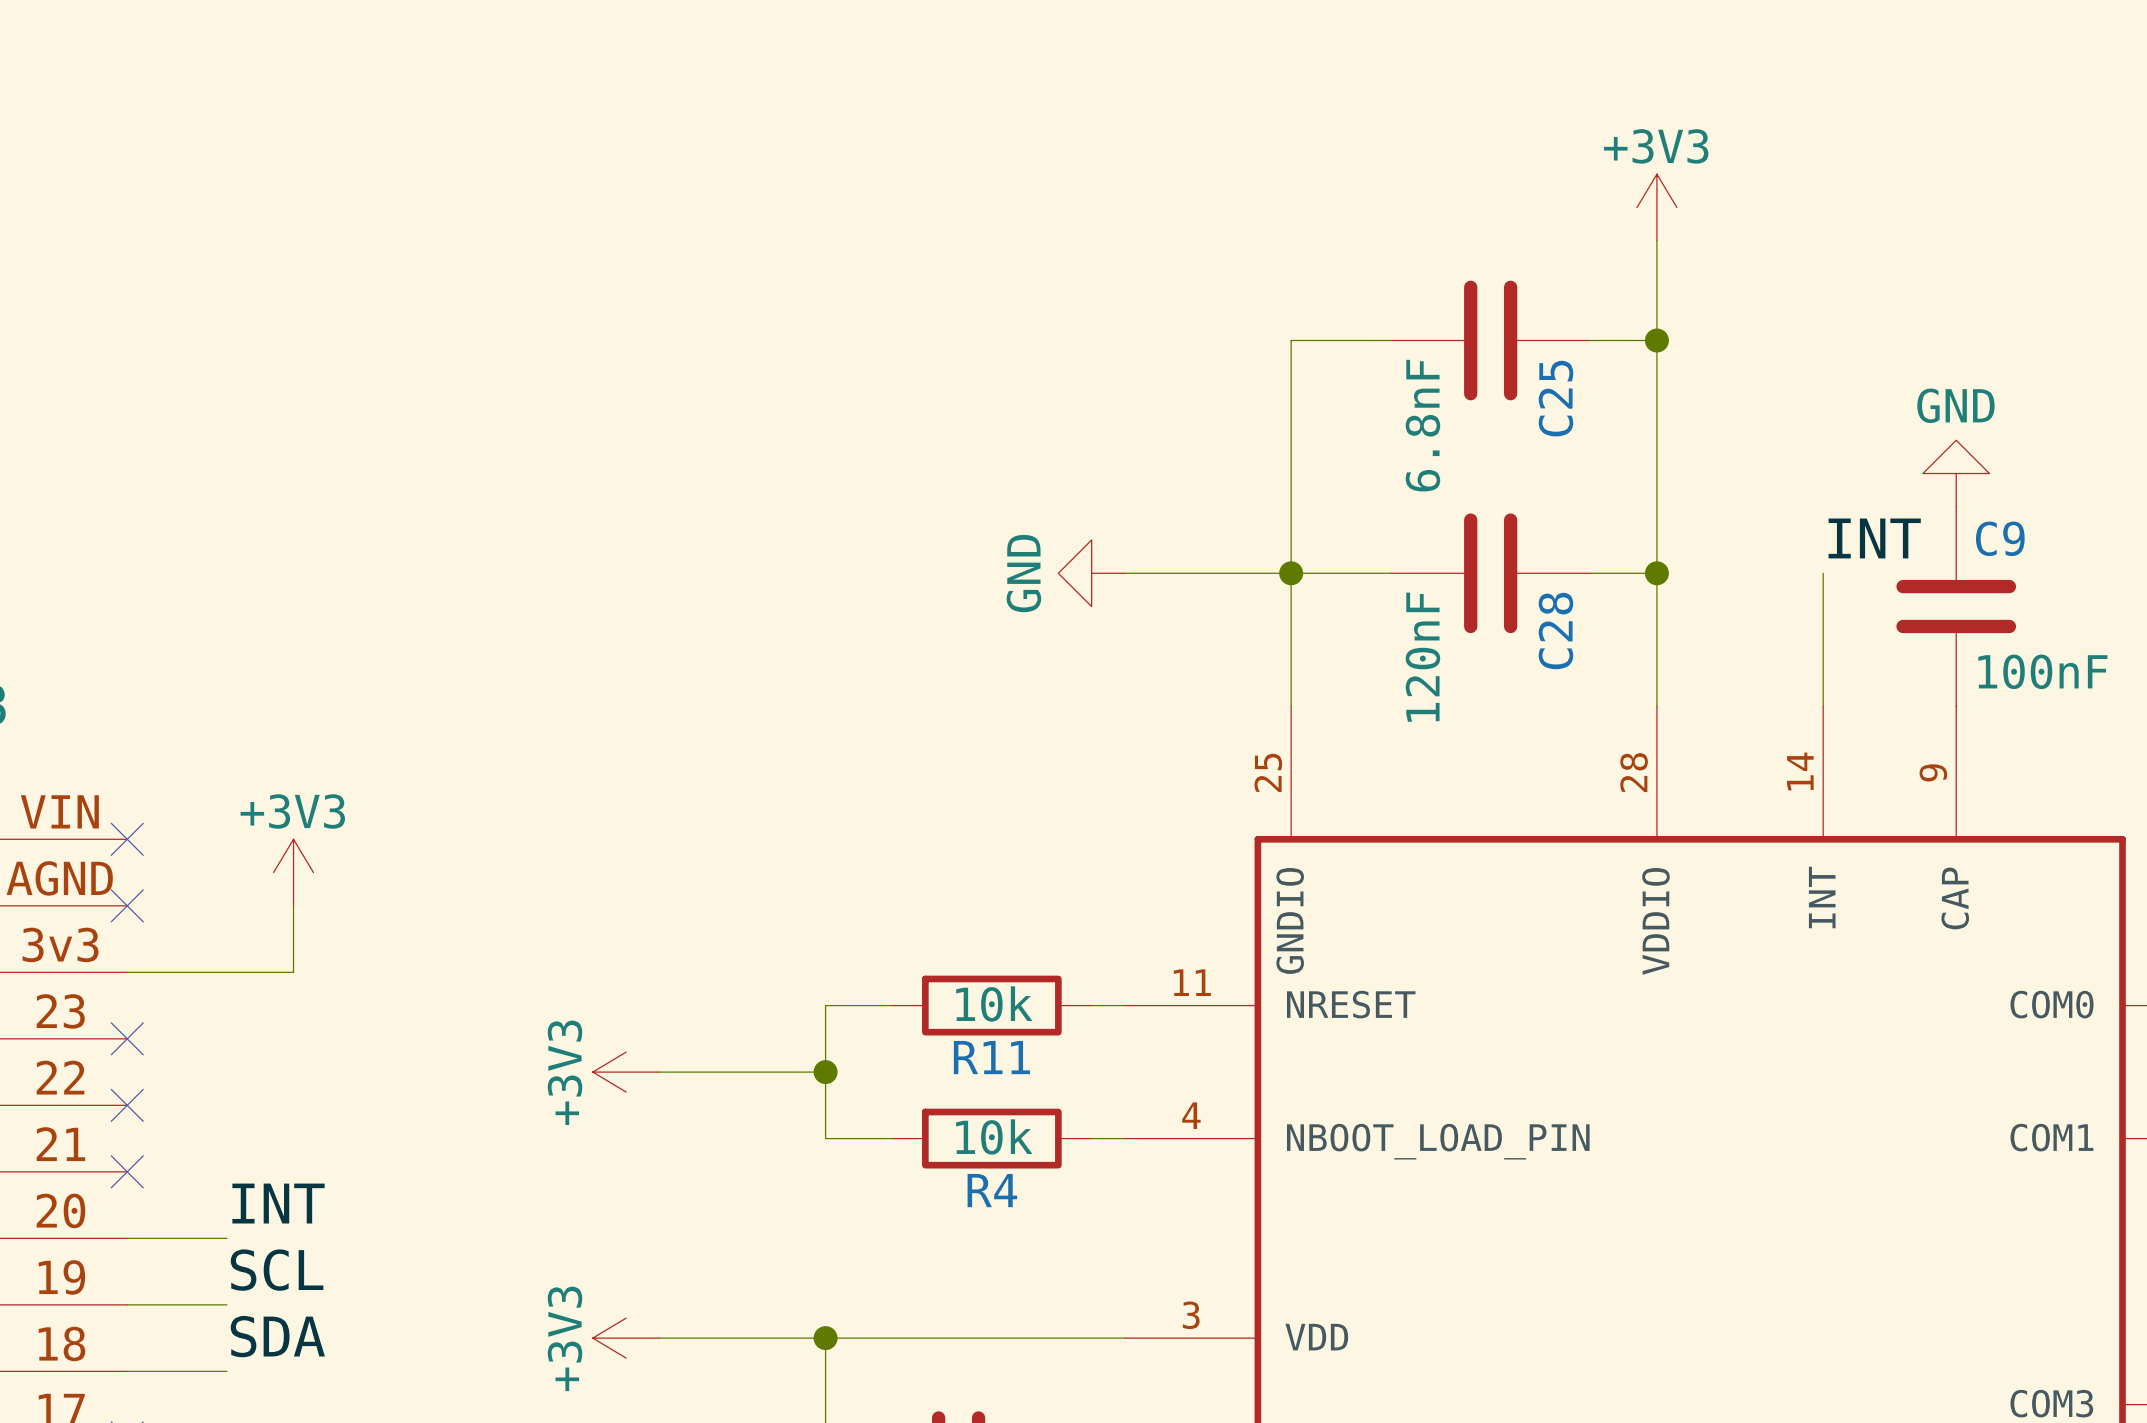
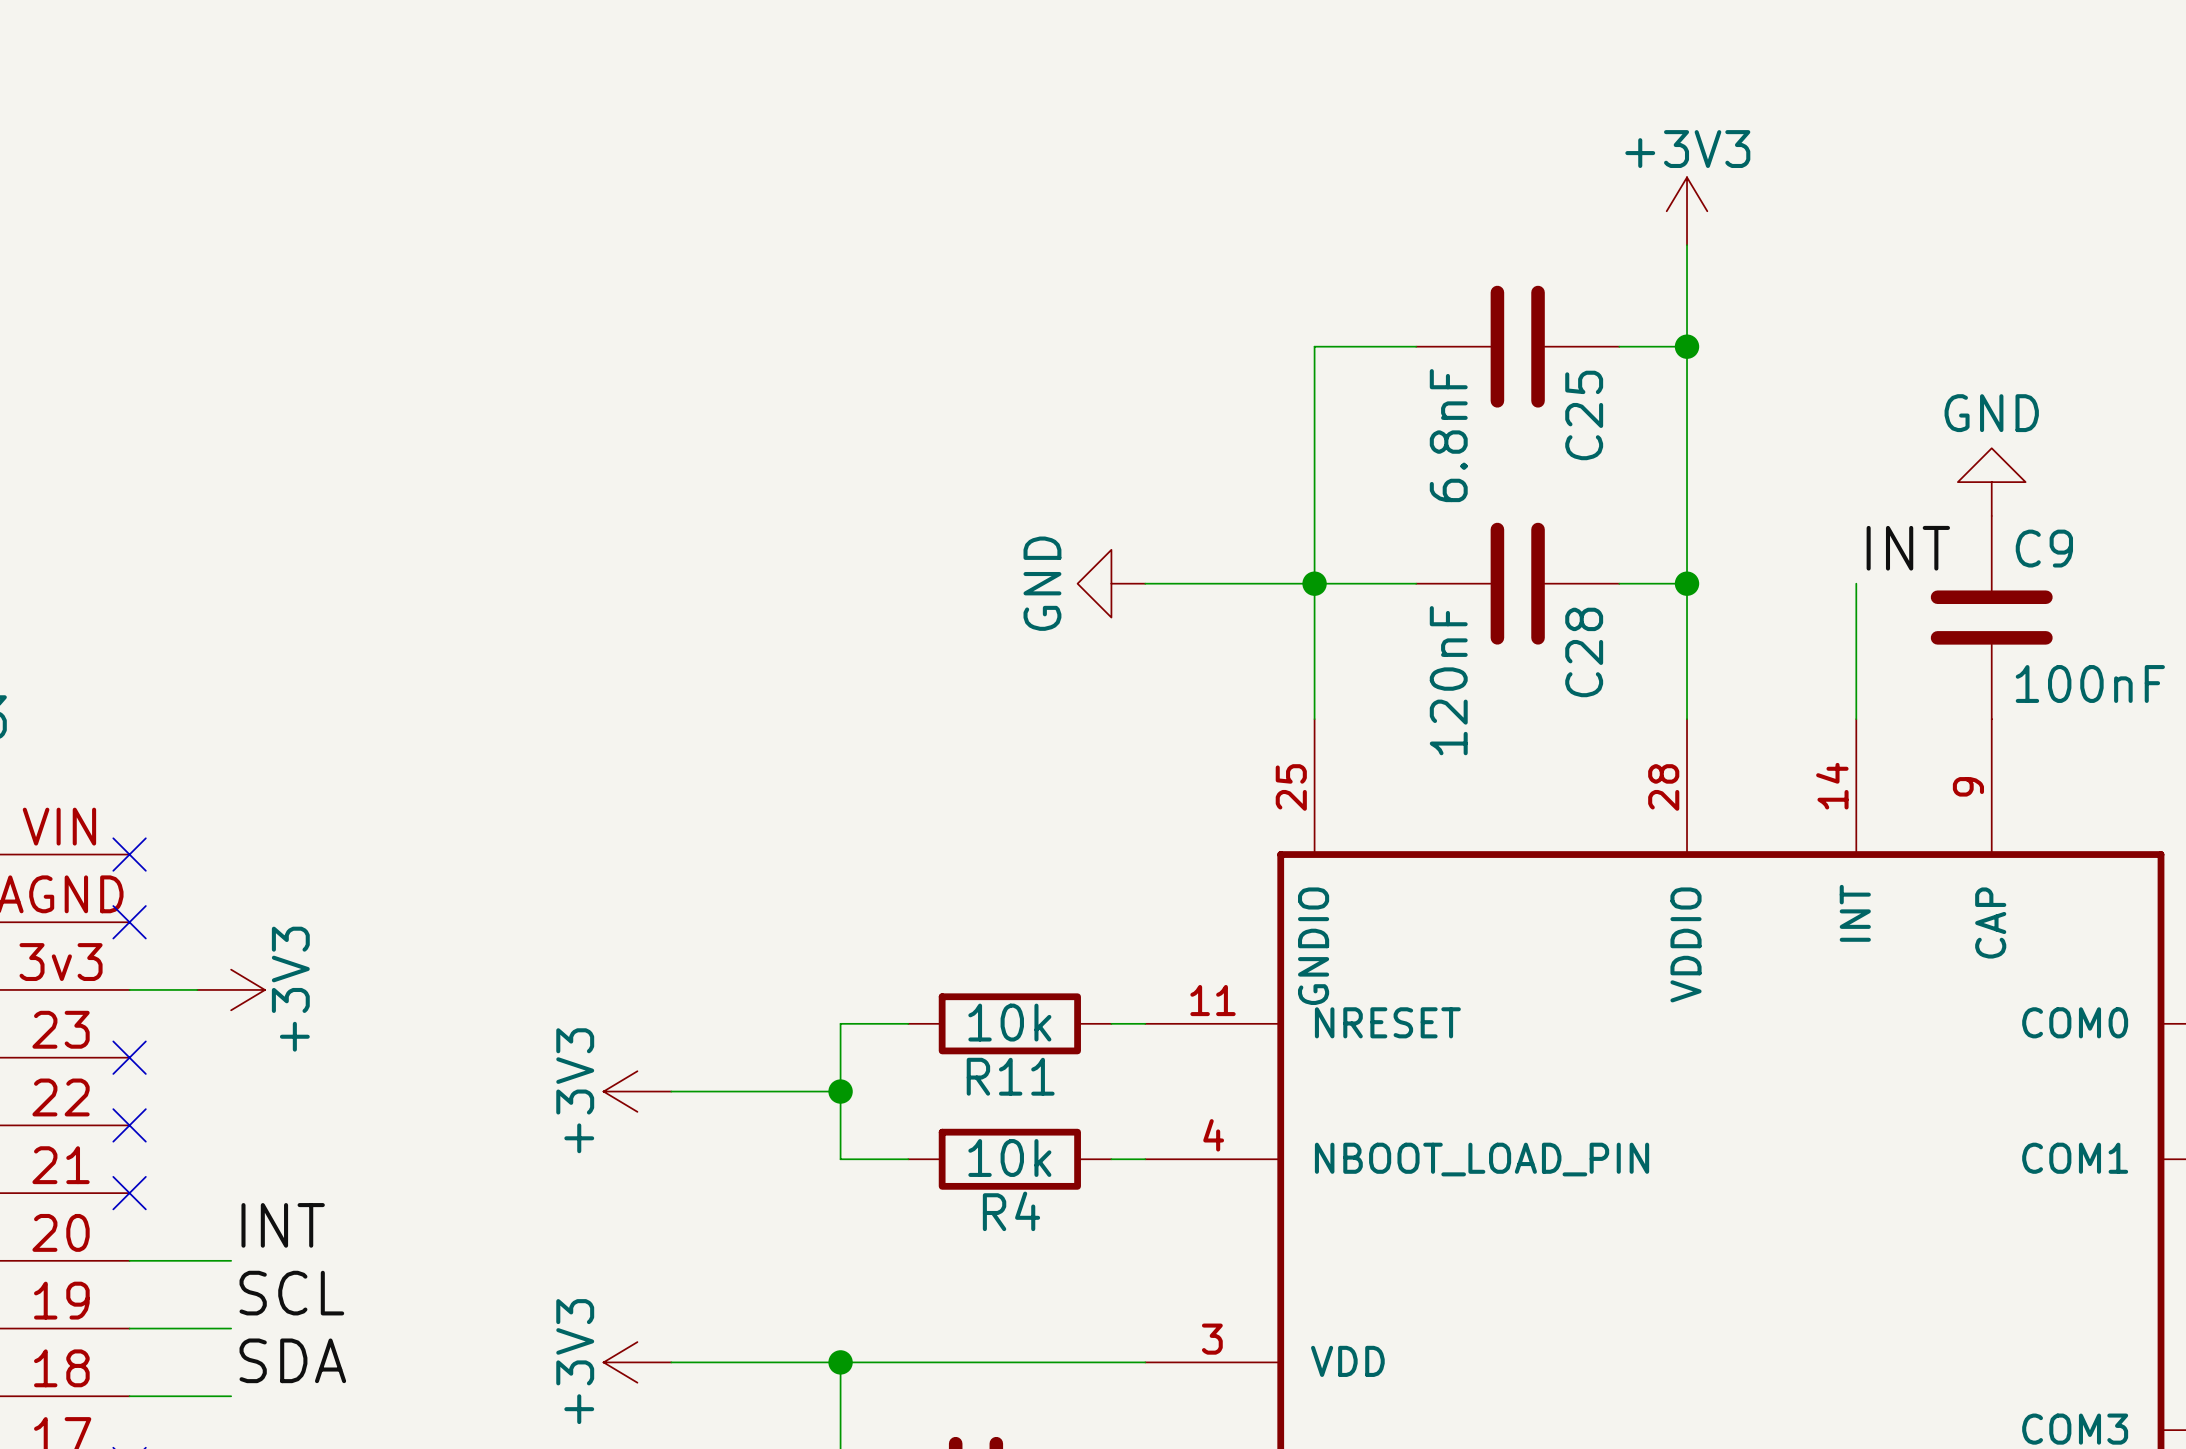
power symbol rotation: 0° (293, 872) -> 90° clockwise (231, 989)
power symbol position: +3V3 (293, 872) -> +3V3 (231, 989)
wire: (293, 905) (293, 972) (193, 972) -> none

